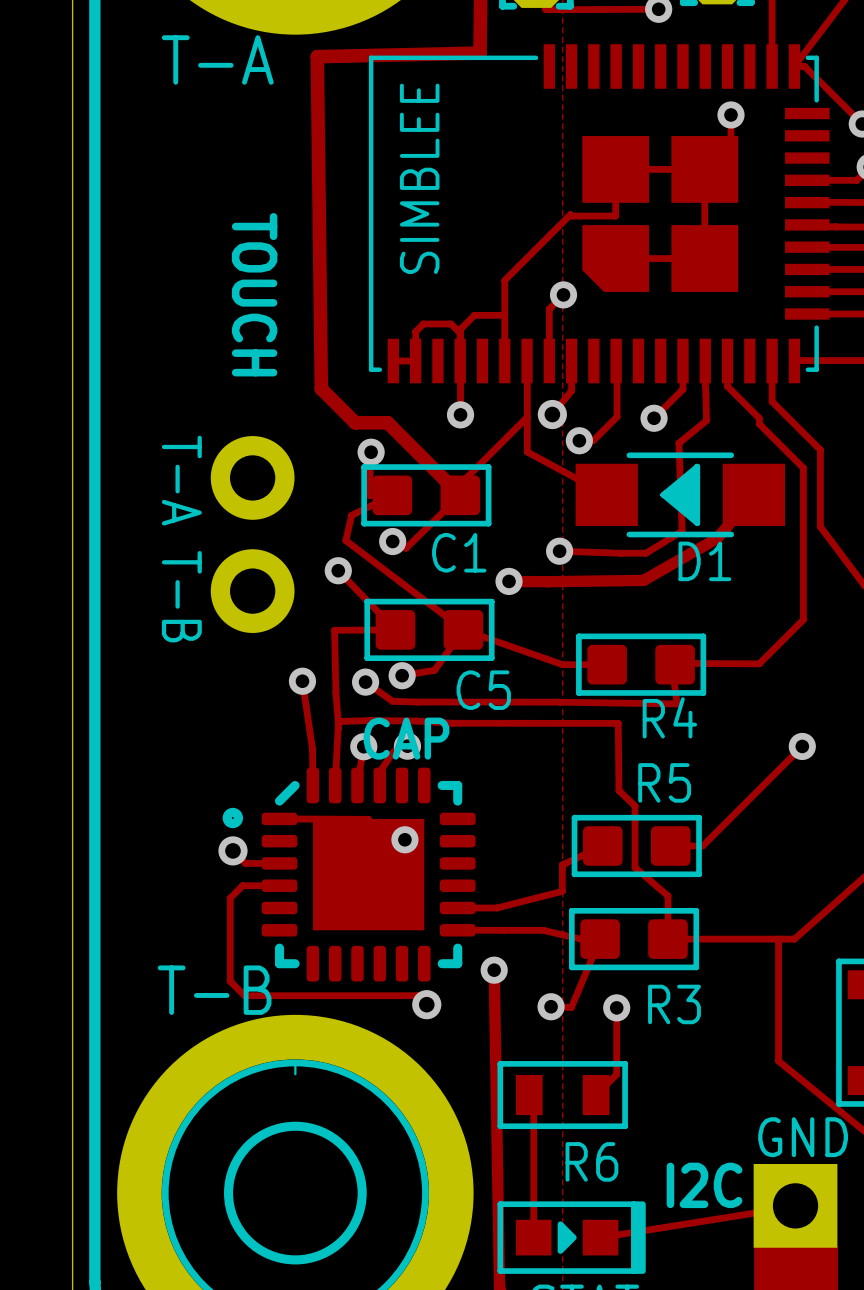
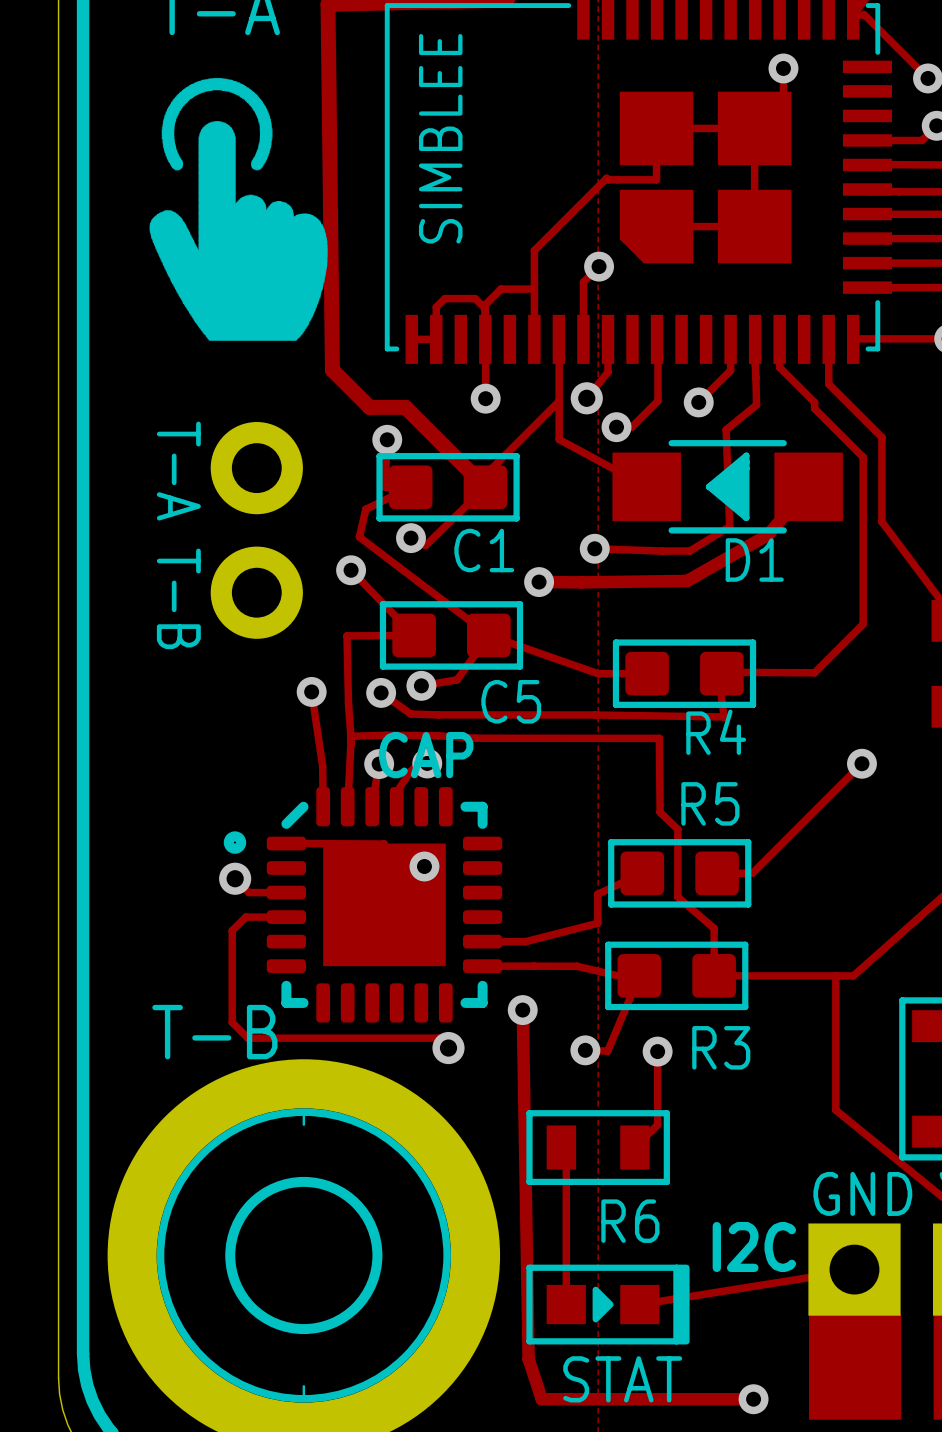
drawing: none -> [149, 78, 328, 341]
TOUCH name: TOUCH (254, 294) -> none

